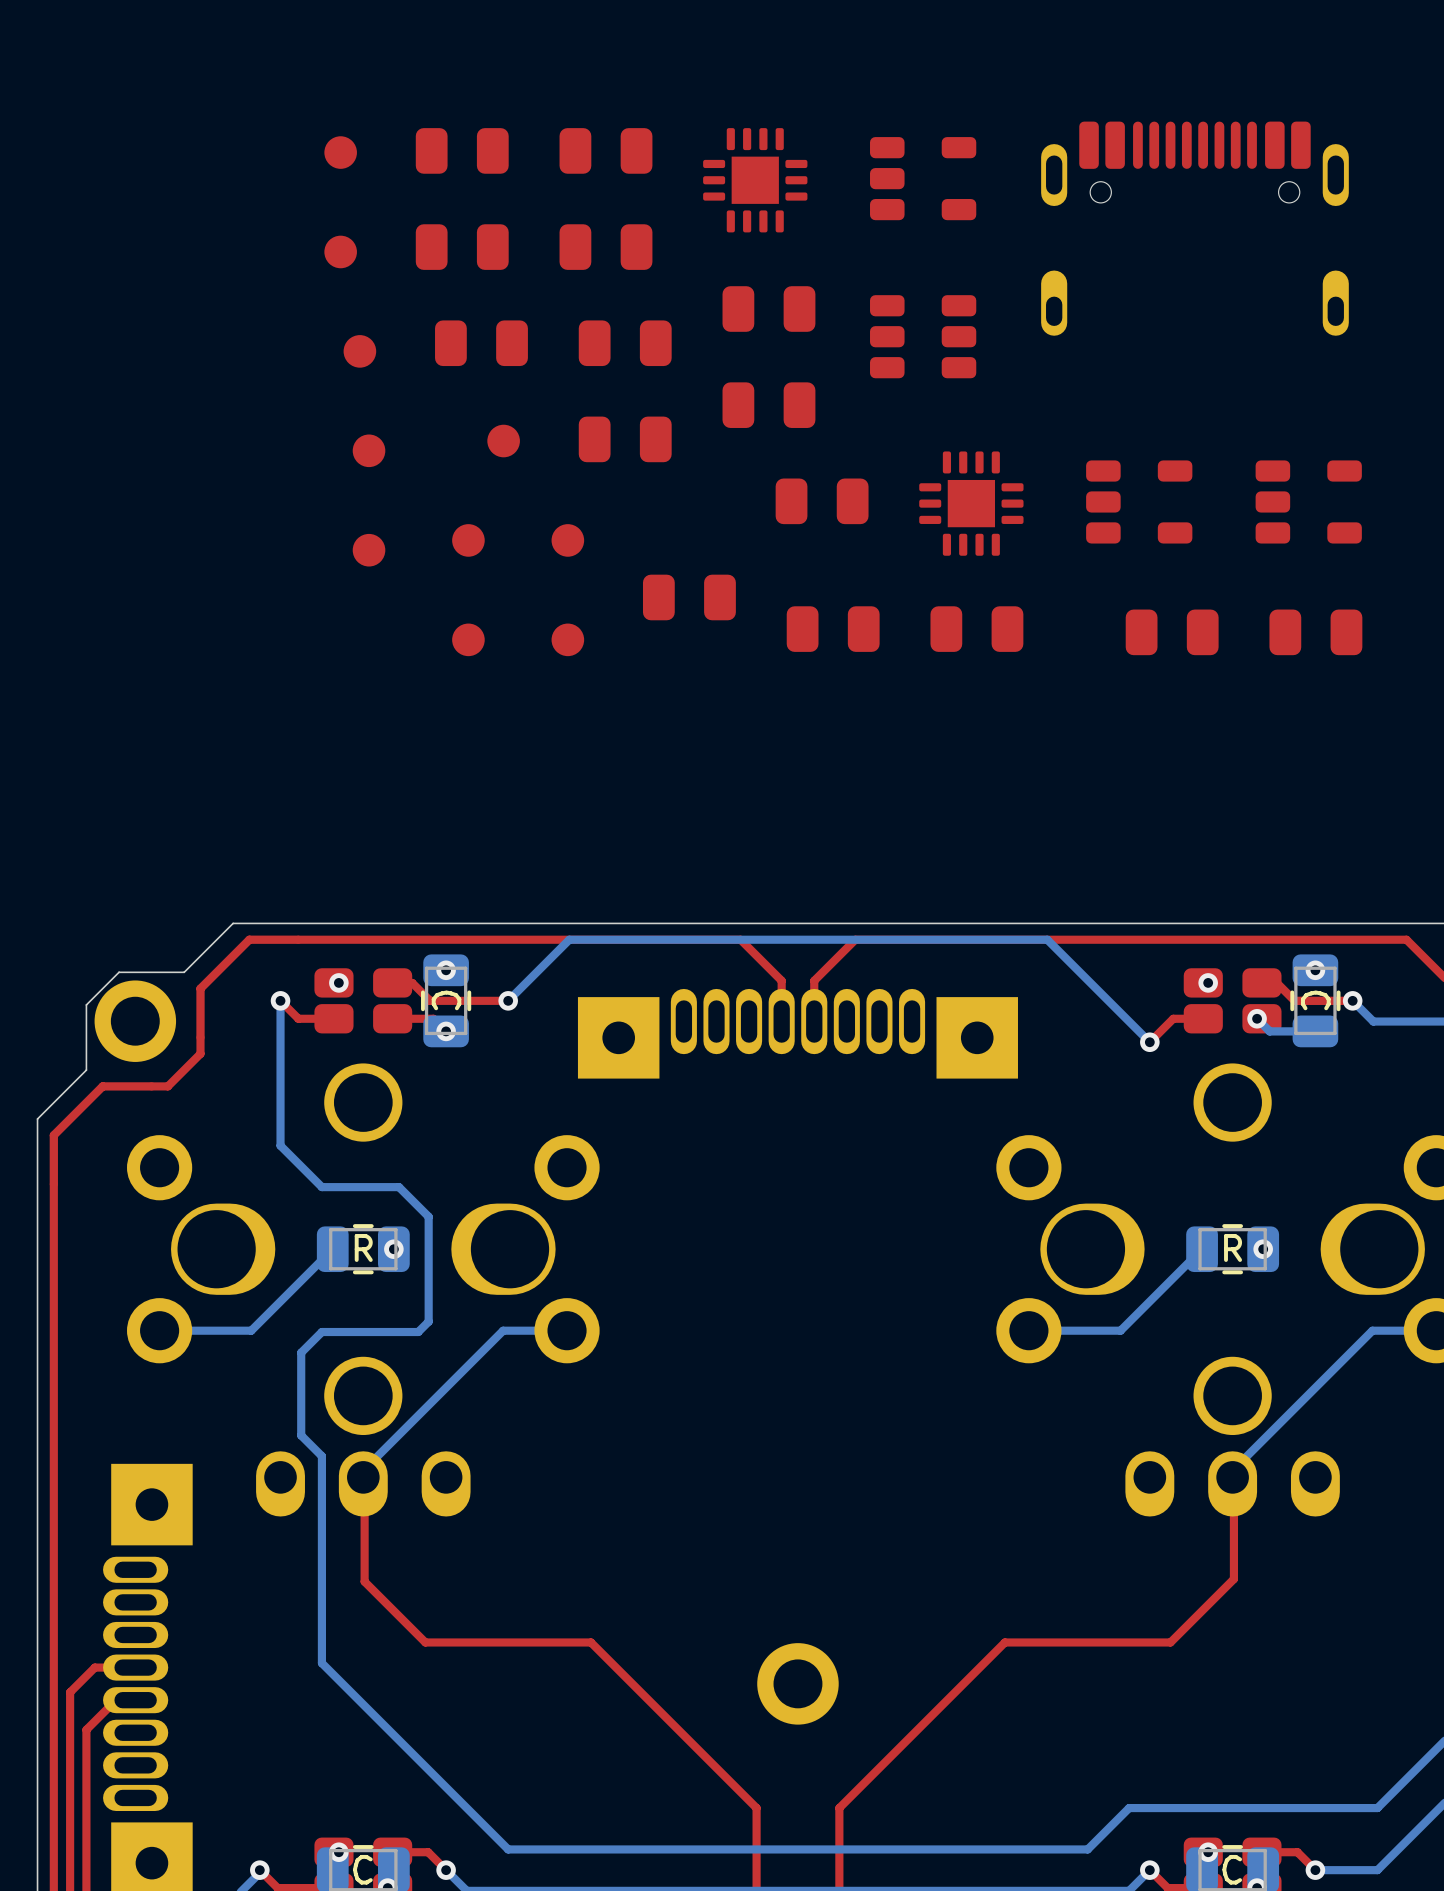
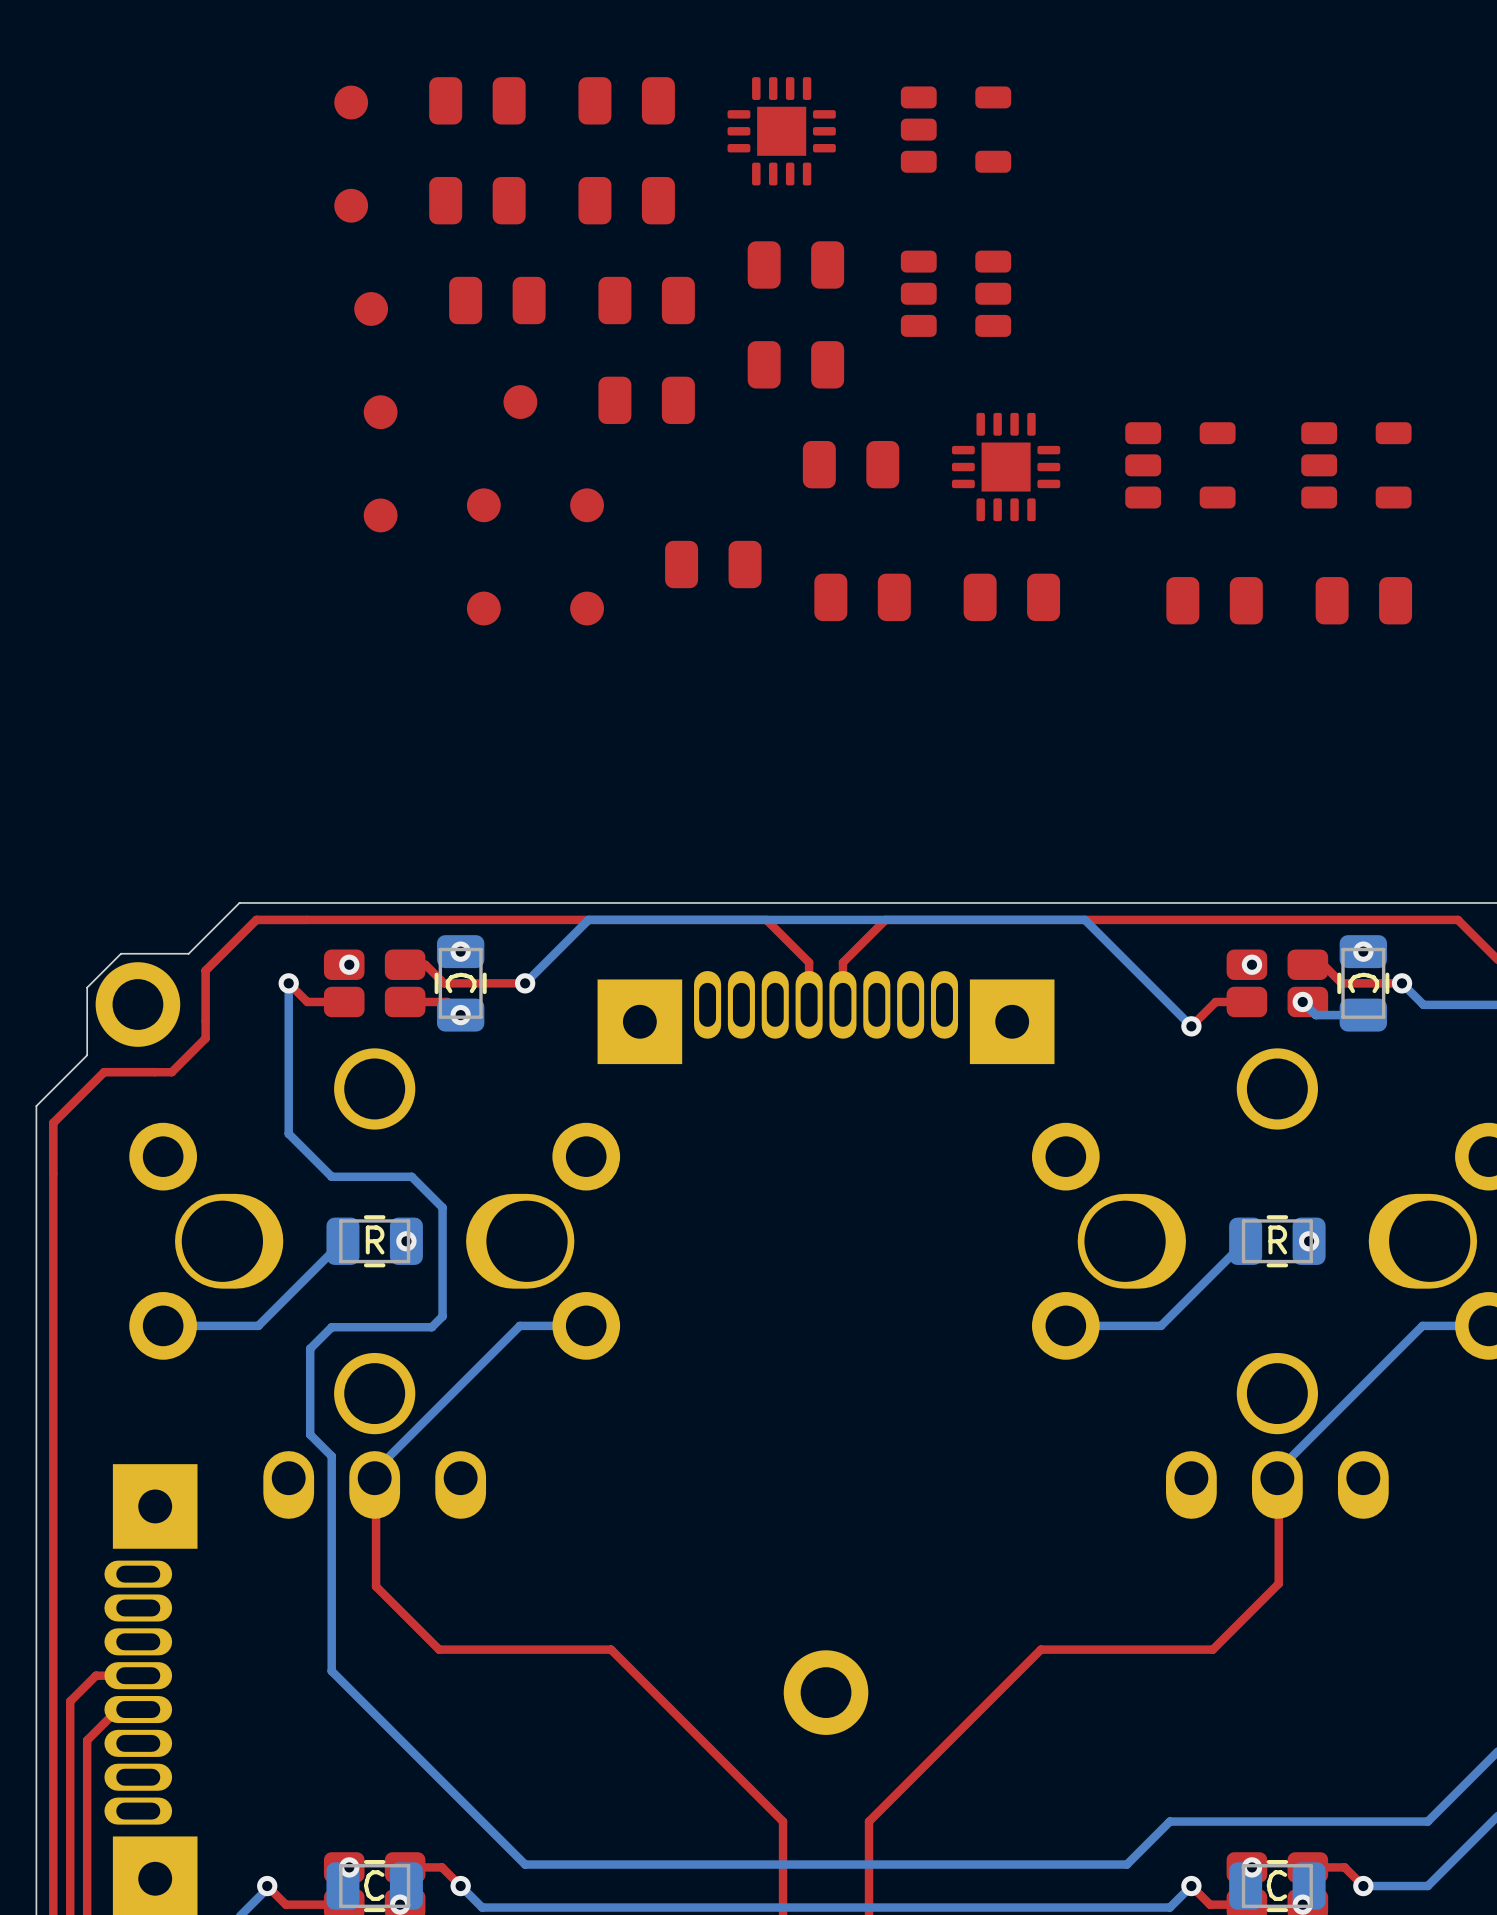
part: (1194, 228) -> none

